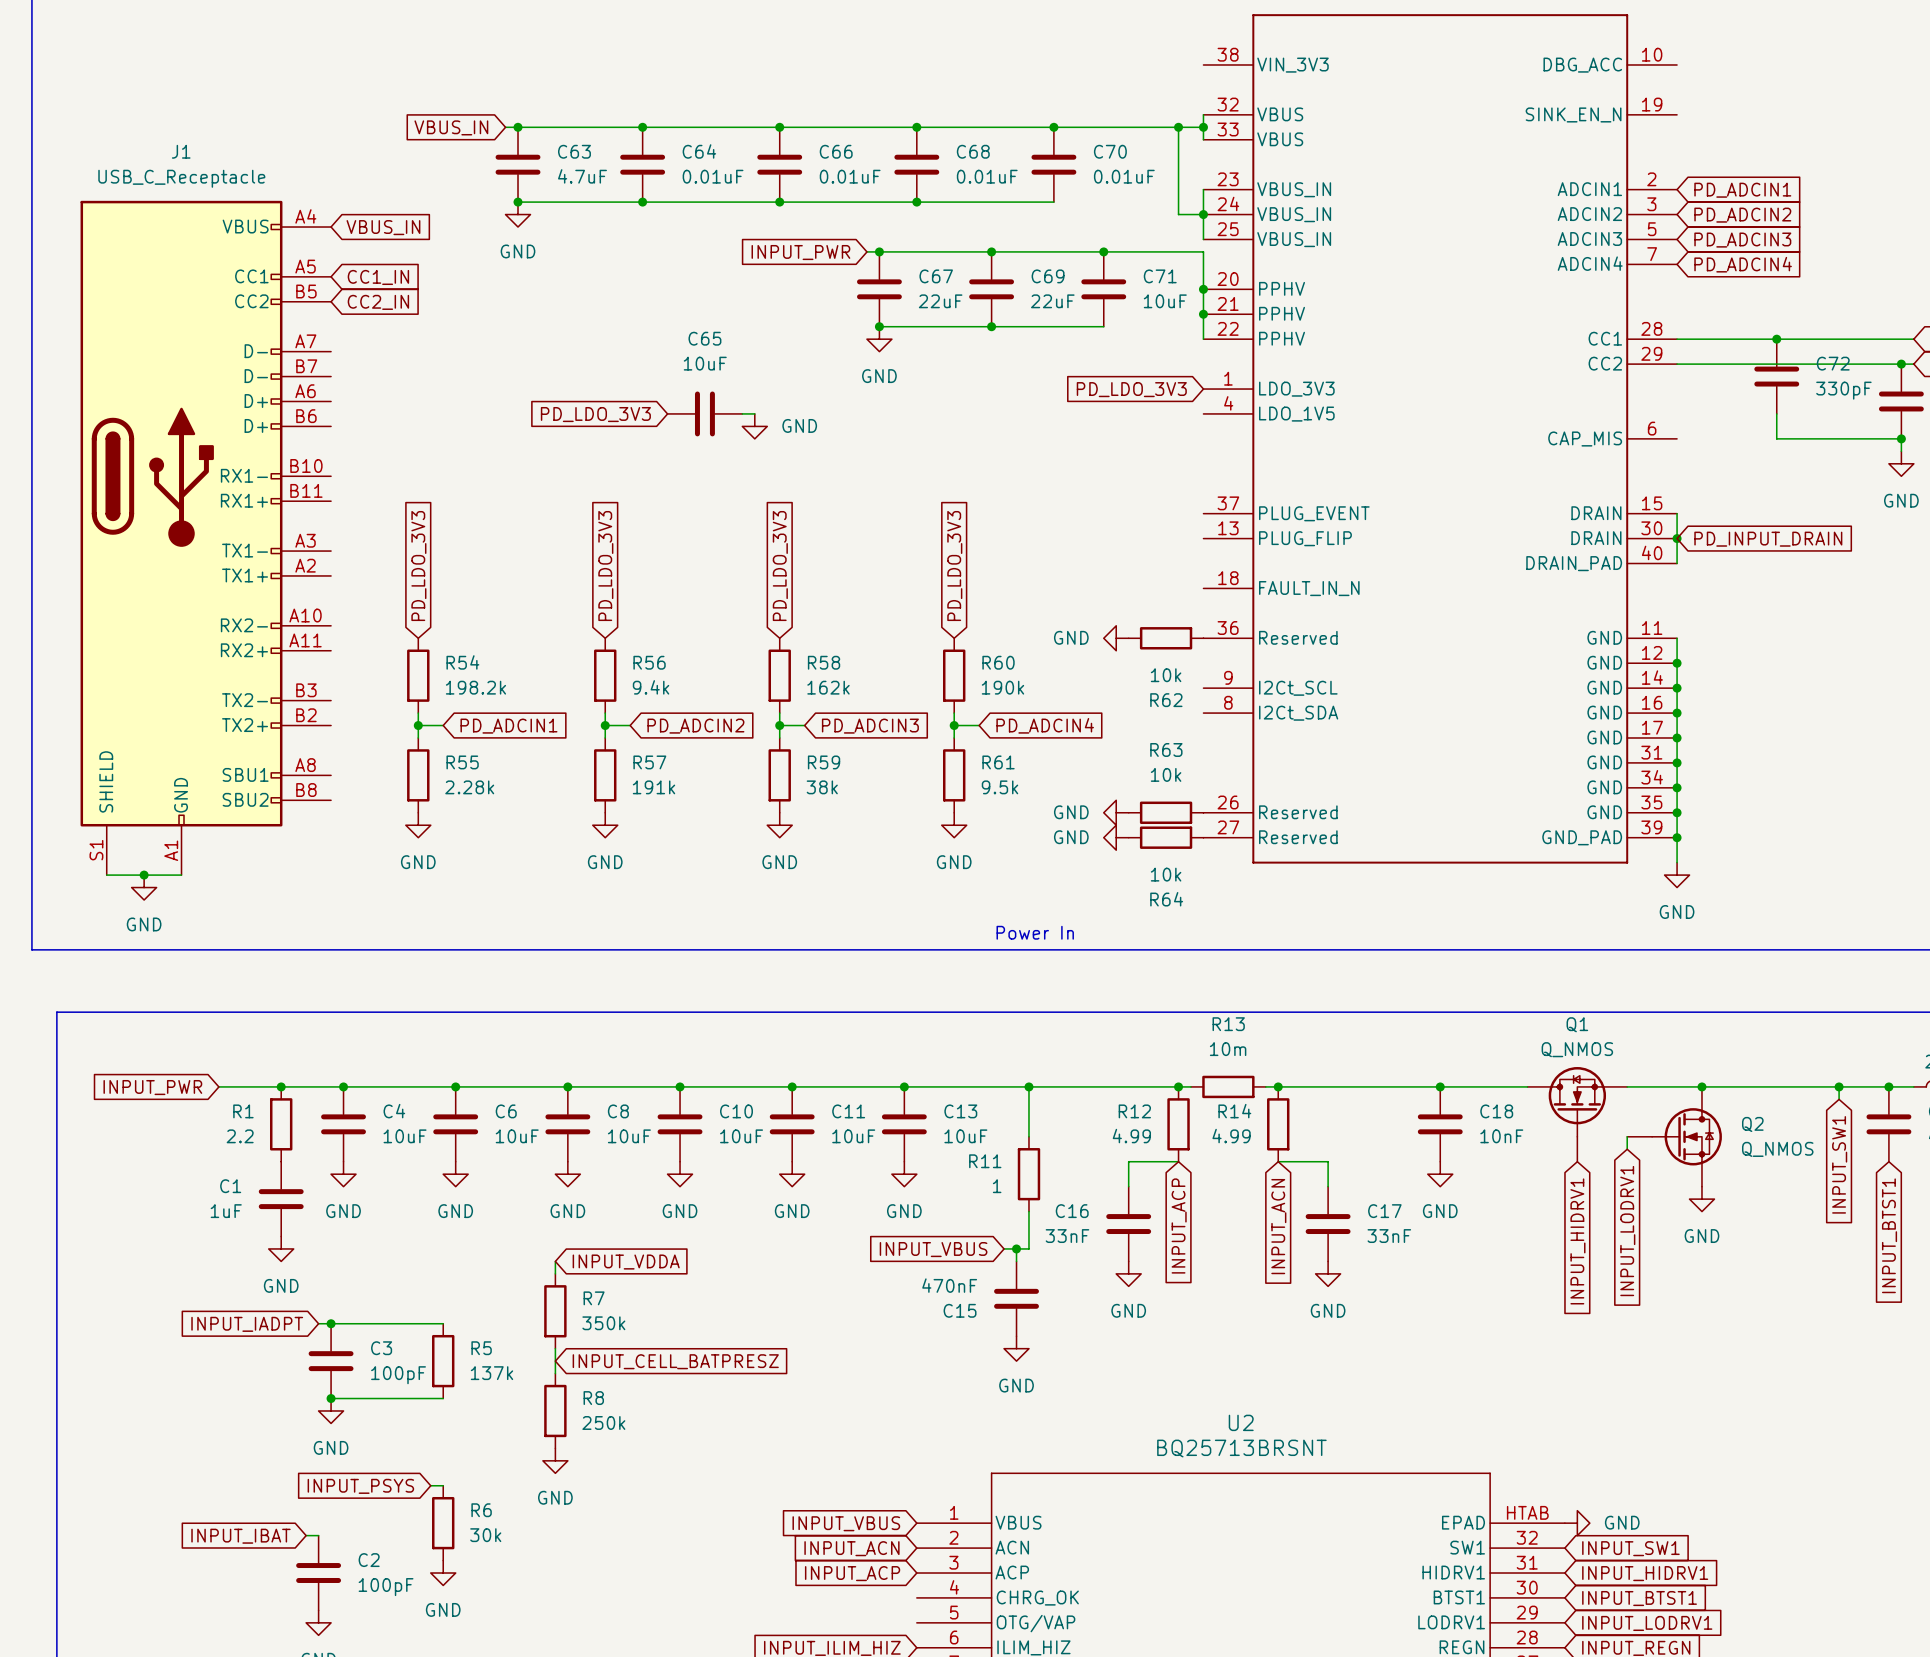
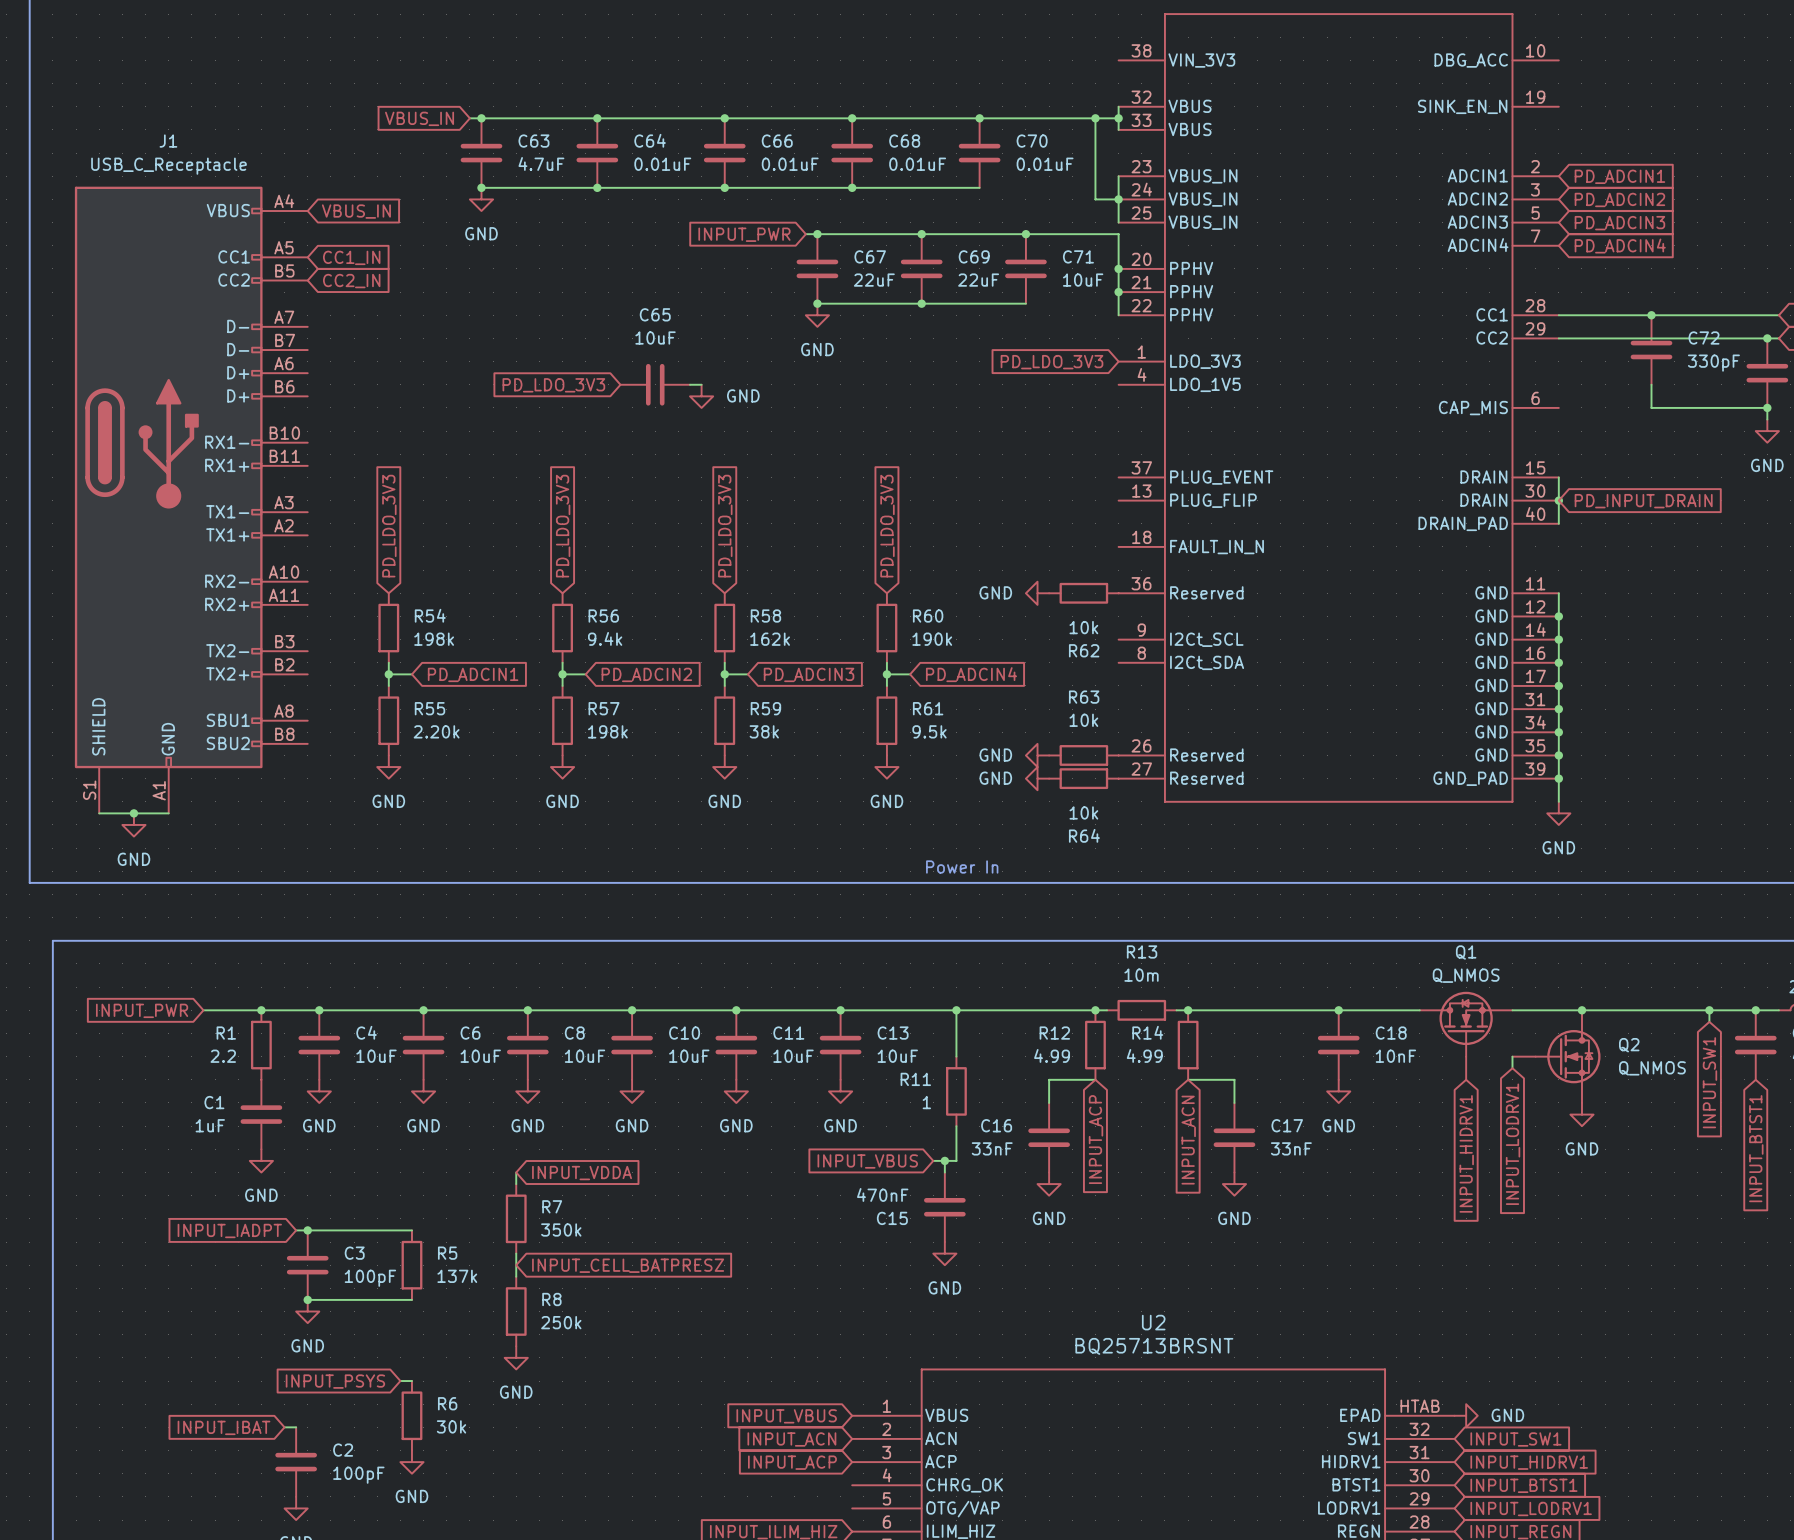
R54 value: 198.2k (475, 687) -> 198k (434, 639)
R55 value: 2.28k (469, 787) -> 2.20k (436, 731)
R57 value: 191k (654, 787) -> 198k (607, 731)

